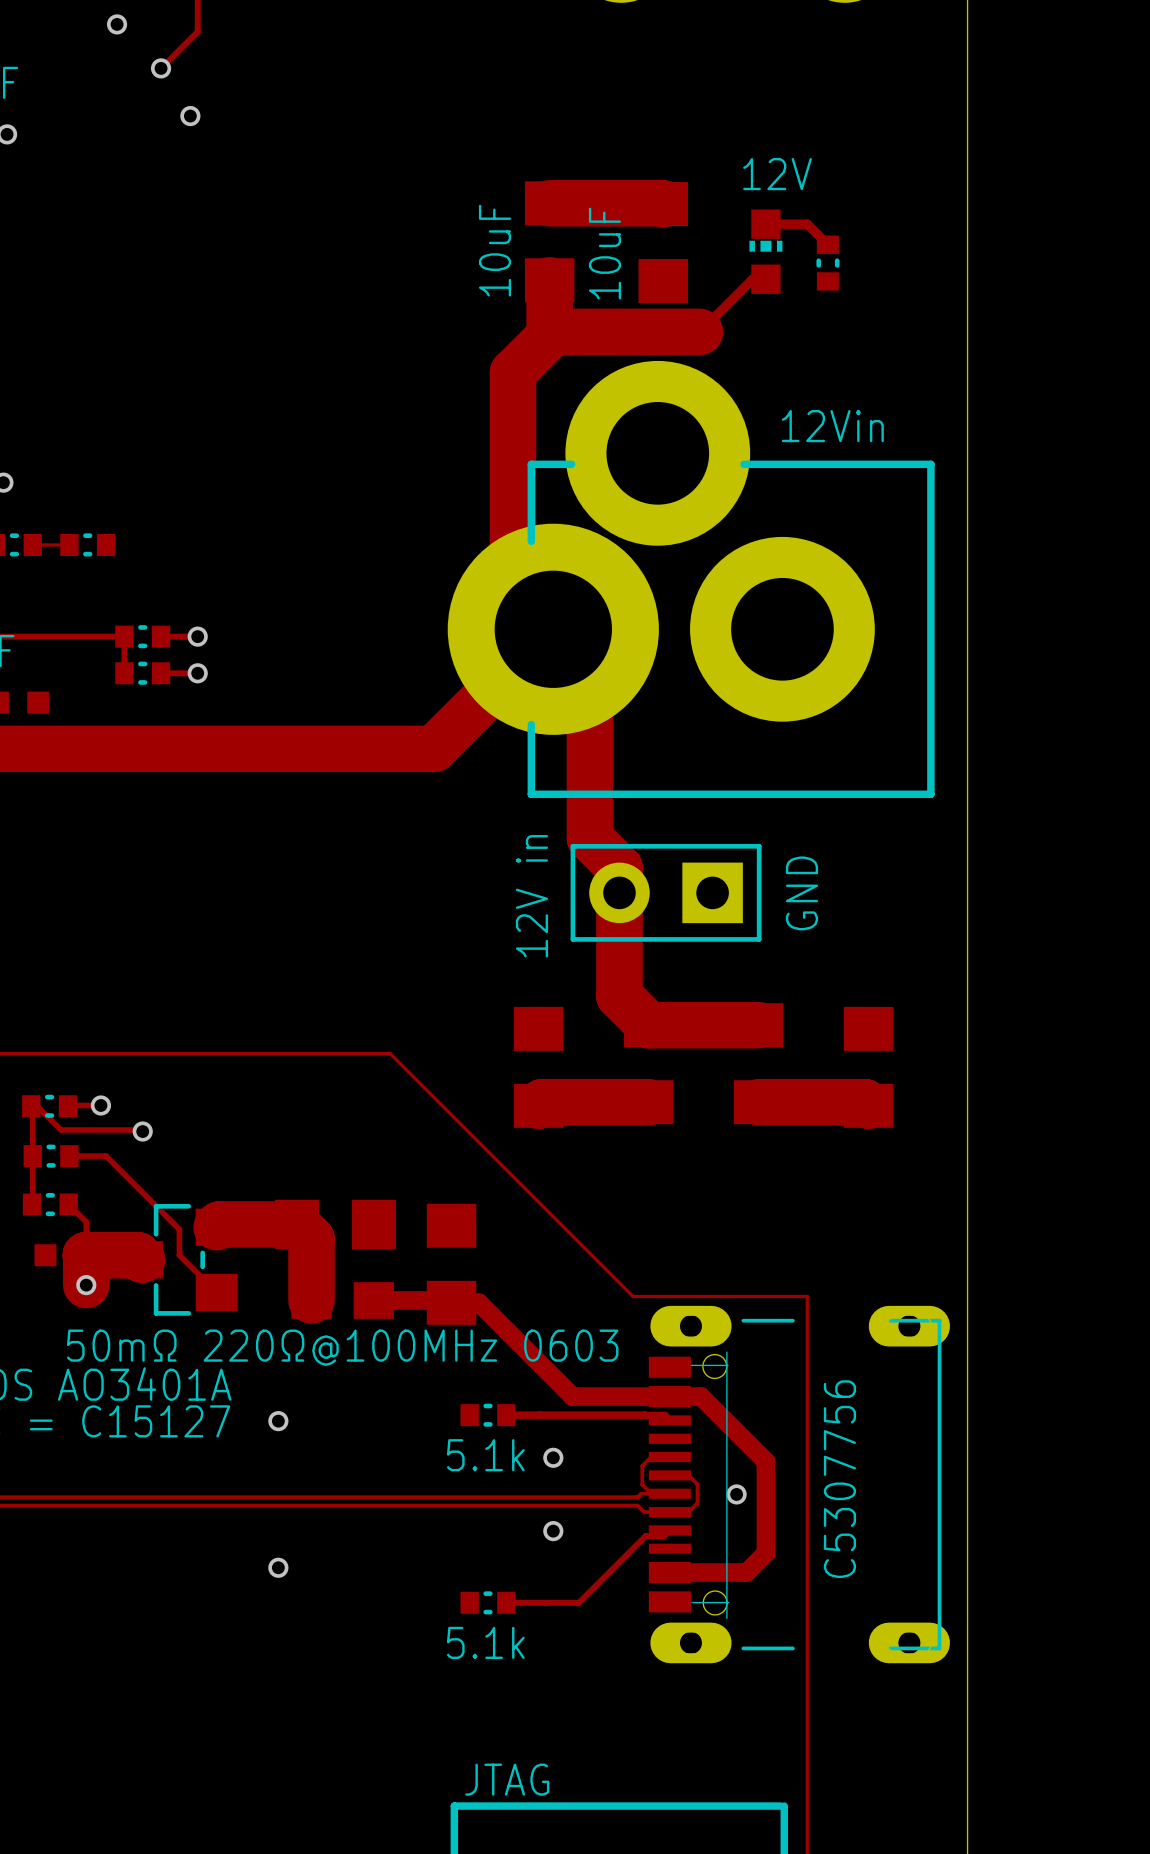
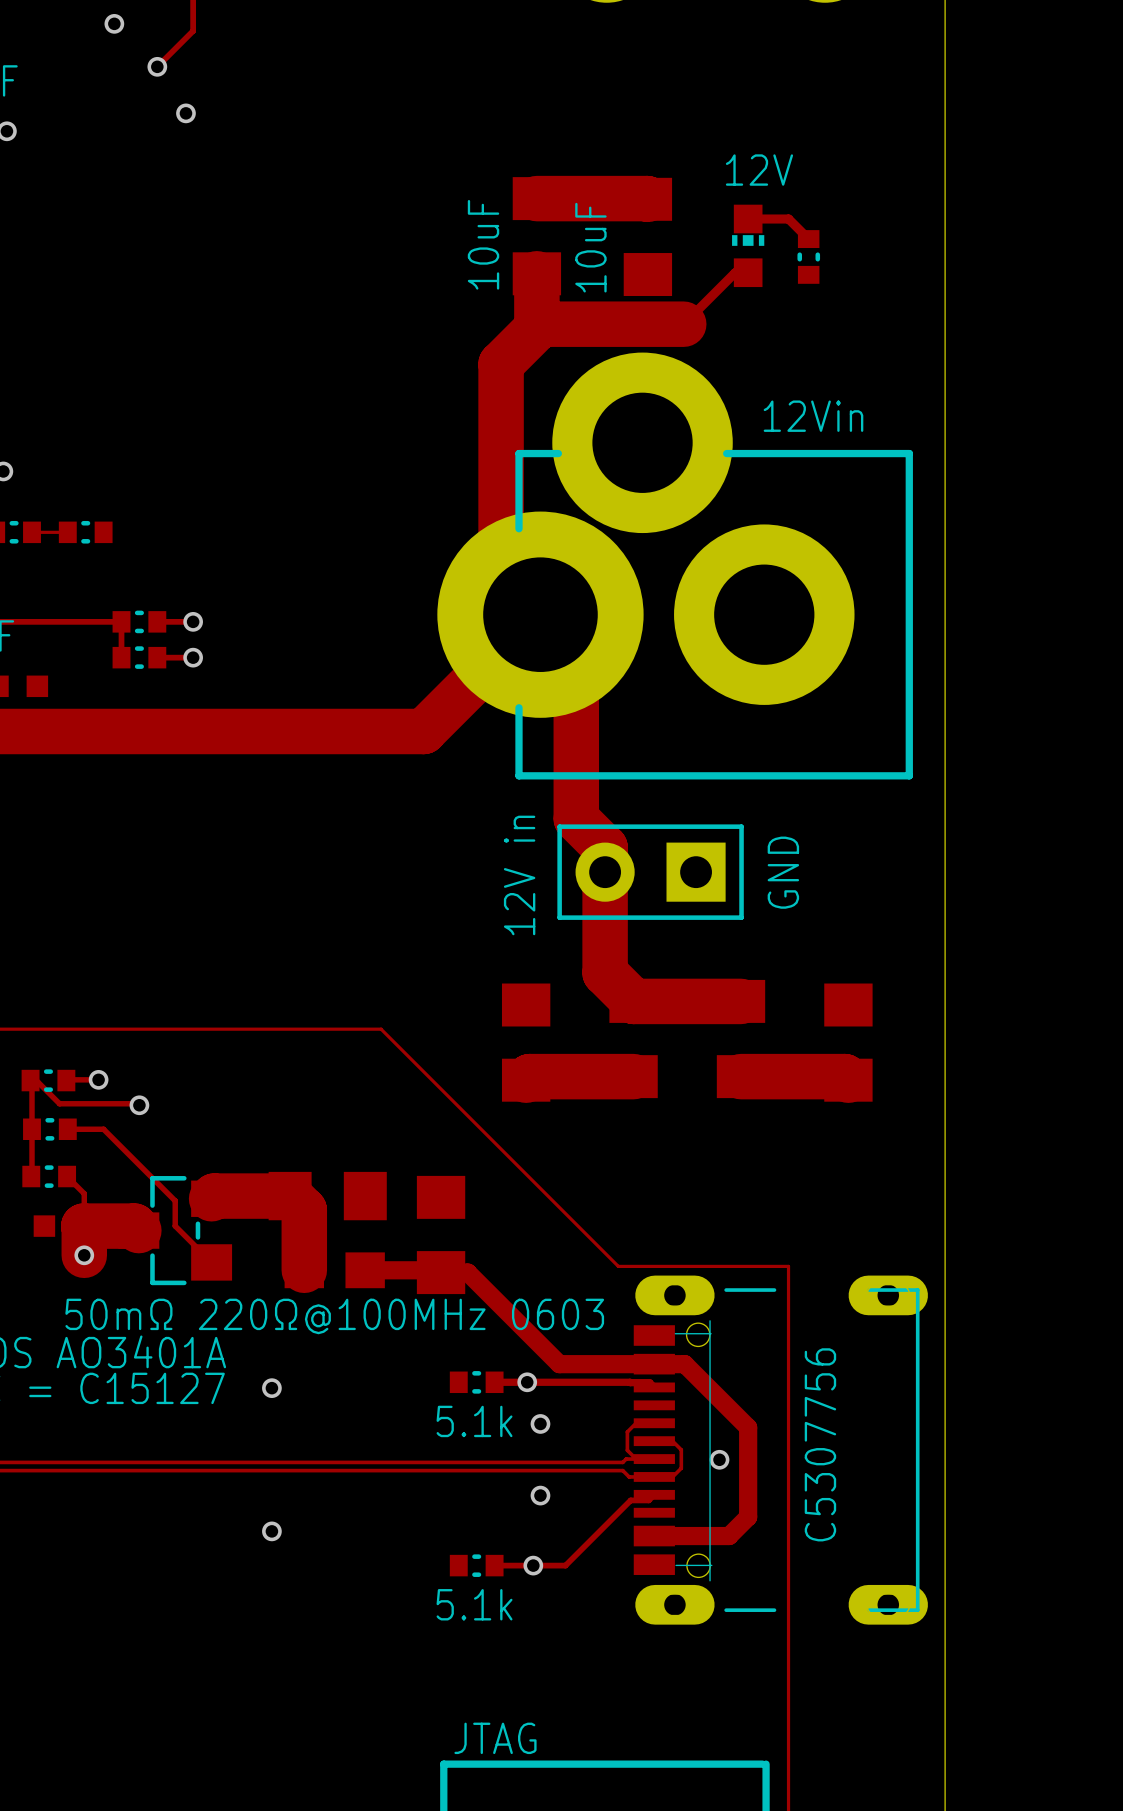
via: none -> (527, 1382)
via: none -> (533, 1565)

